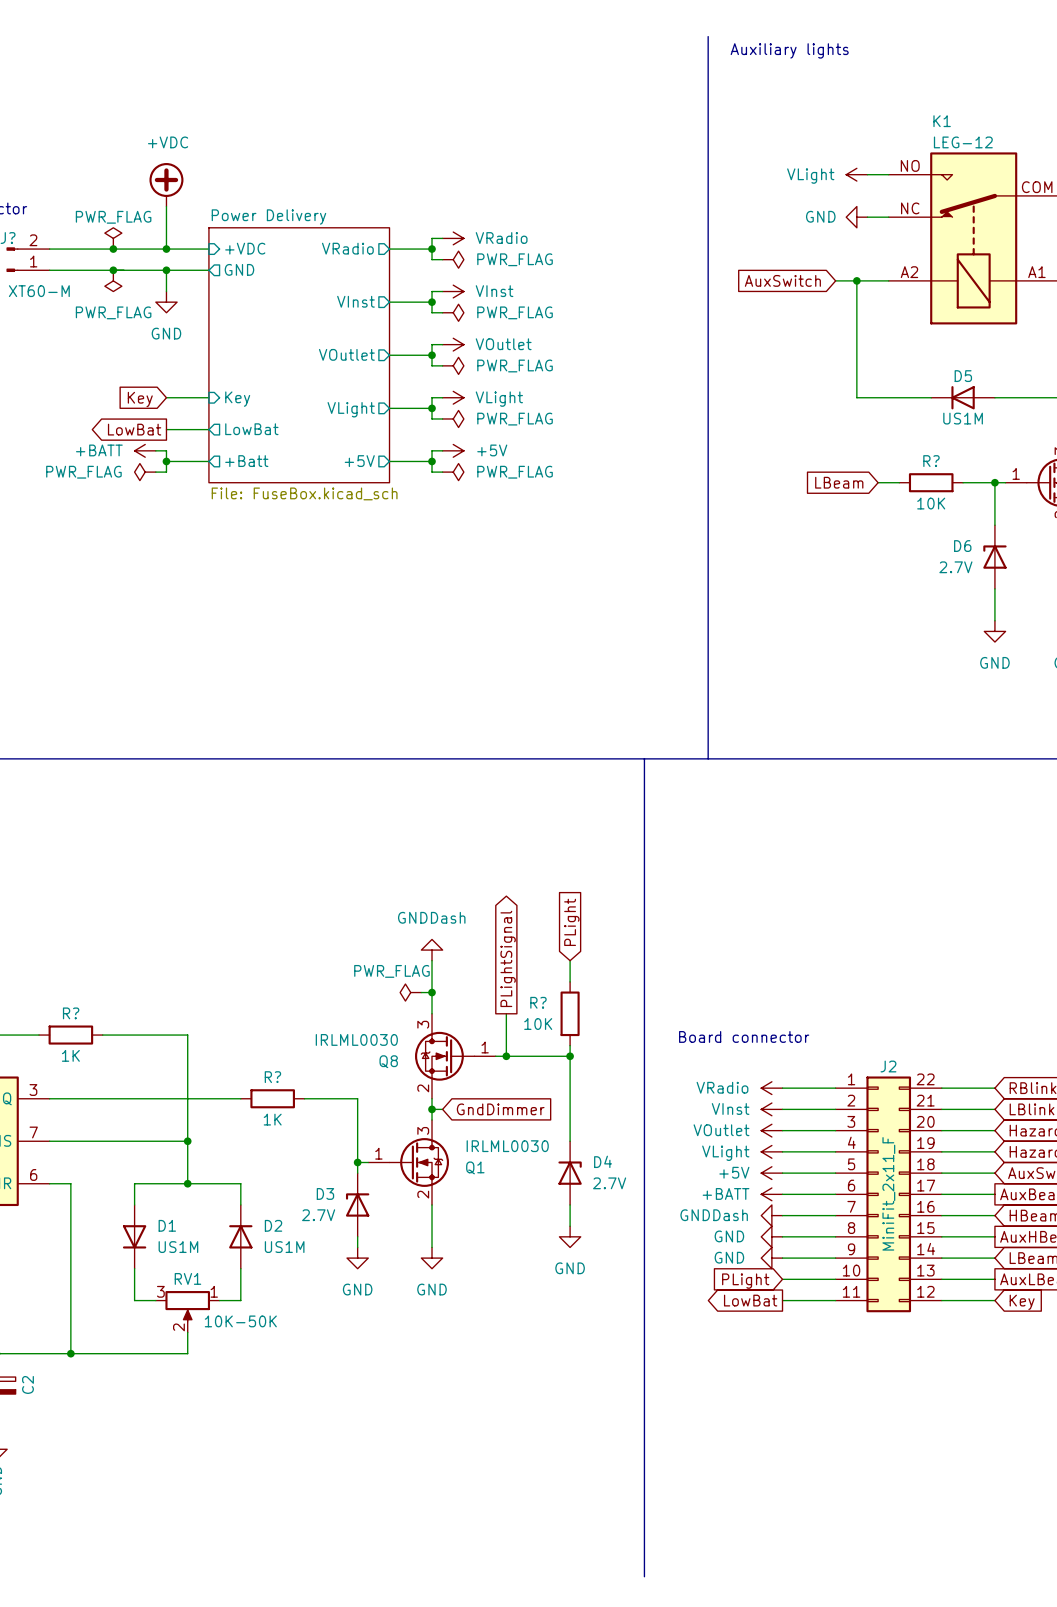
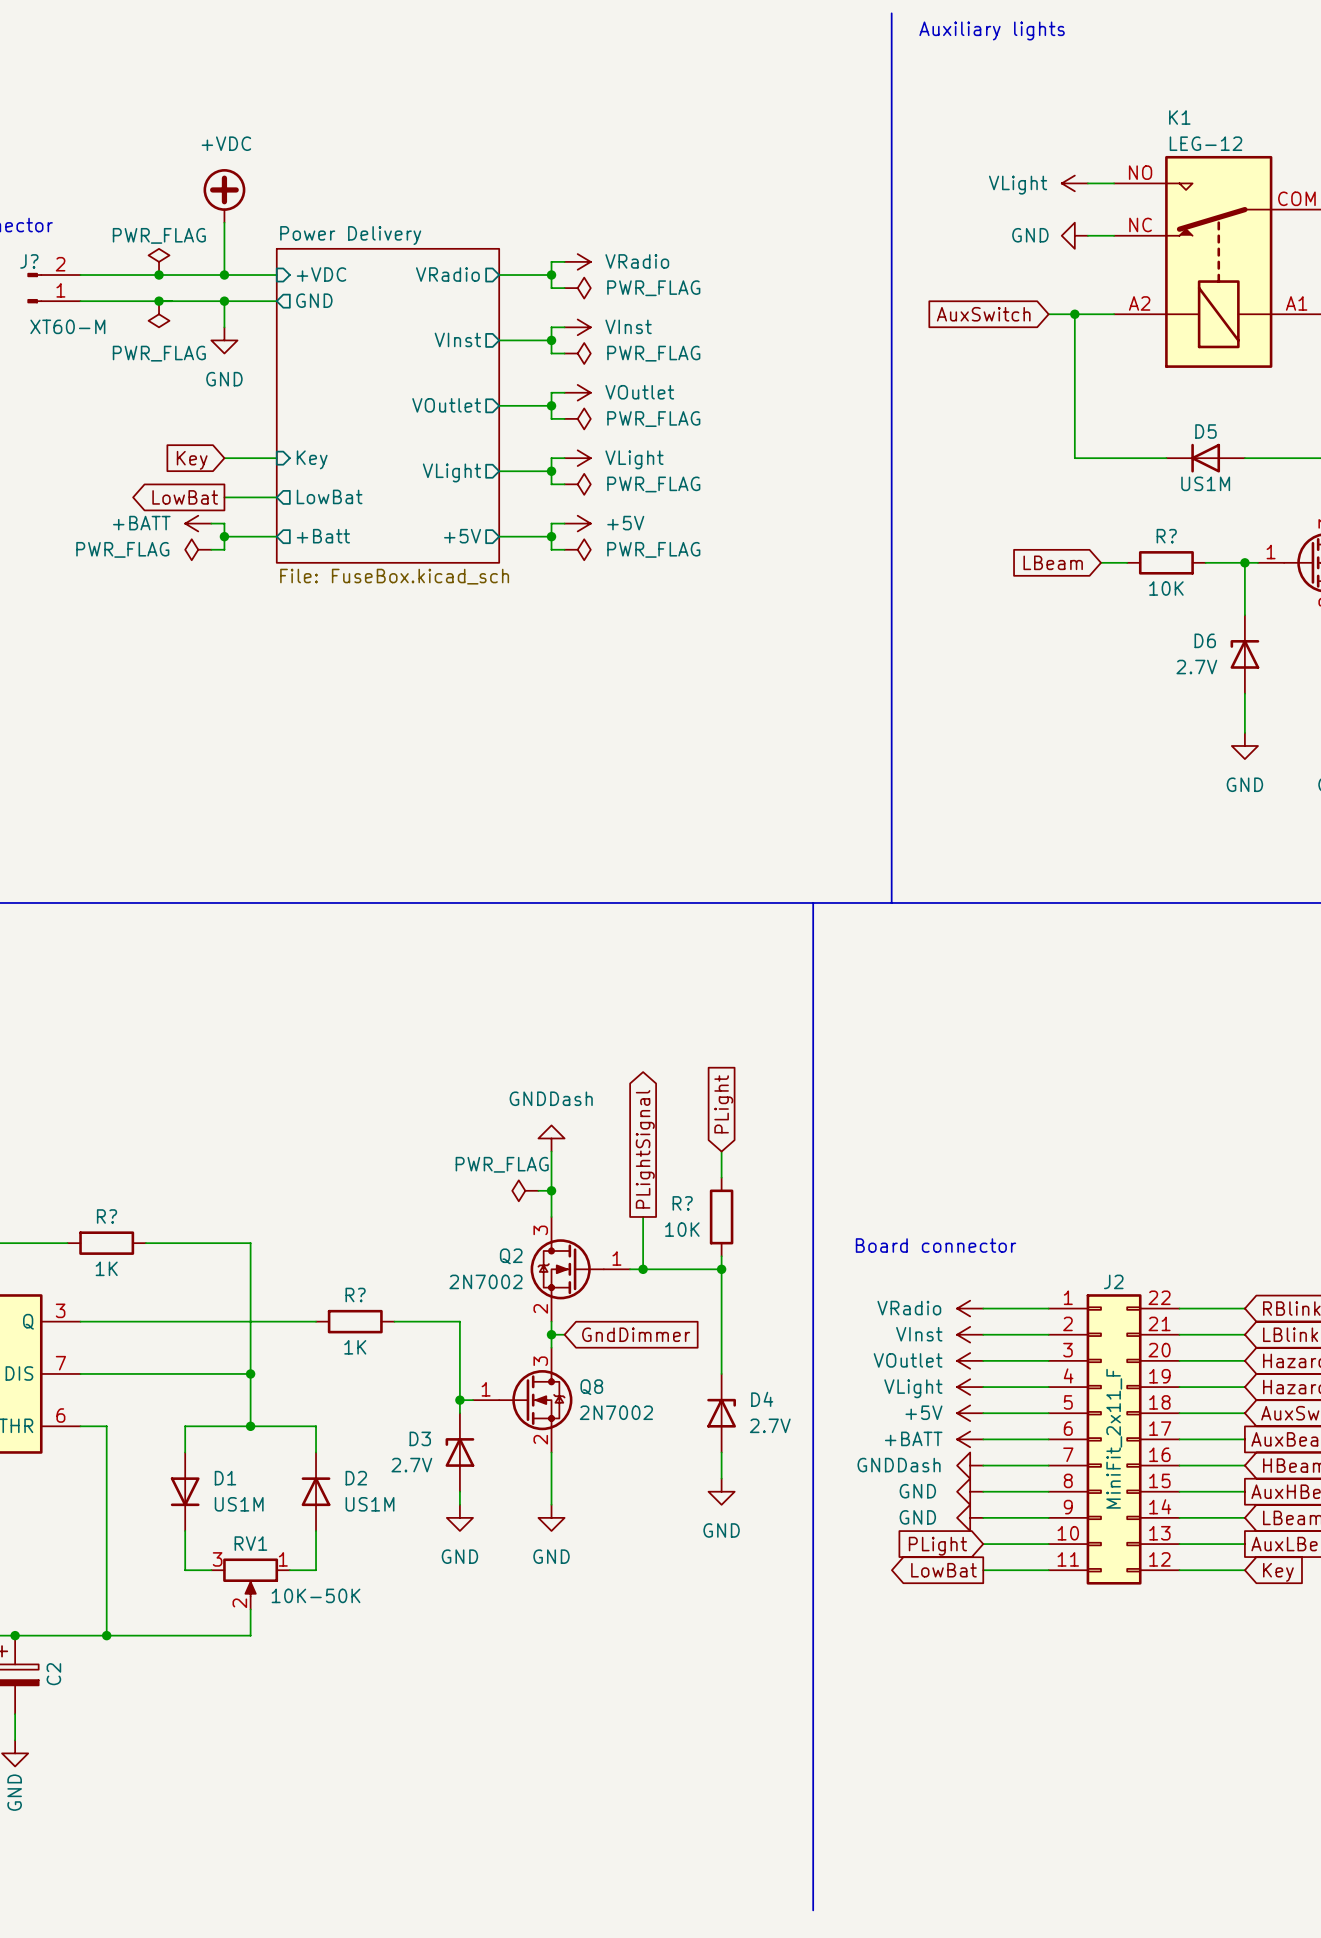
Q8 value: IRLML0030 (356, 1039) -> 2N7002 (486, 1281)
Q8 name: Q8 (388, 1061) -> Q2 (511, 1256)
Q1 value: IRLML0030 (507, 1146) -> 2N7002 (616, 1412)
Q1 name: Q1 (475, 1167) -> Q8 (591, 1387)

